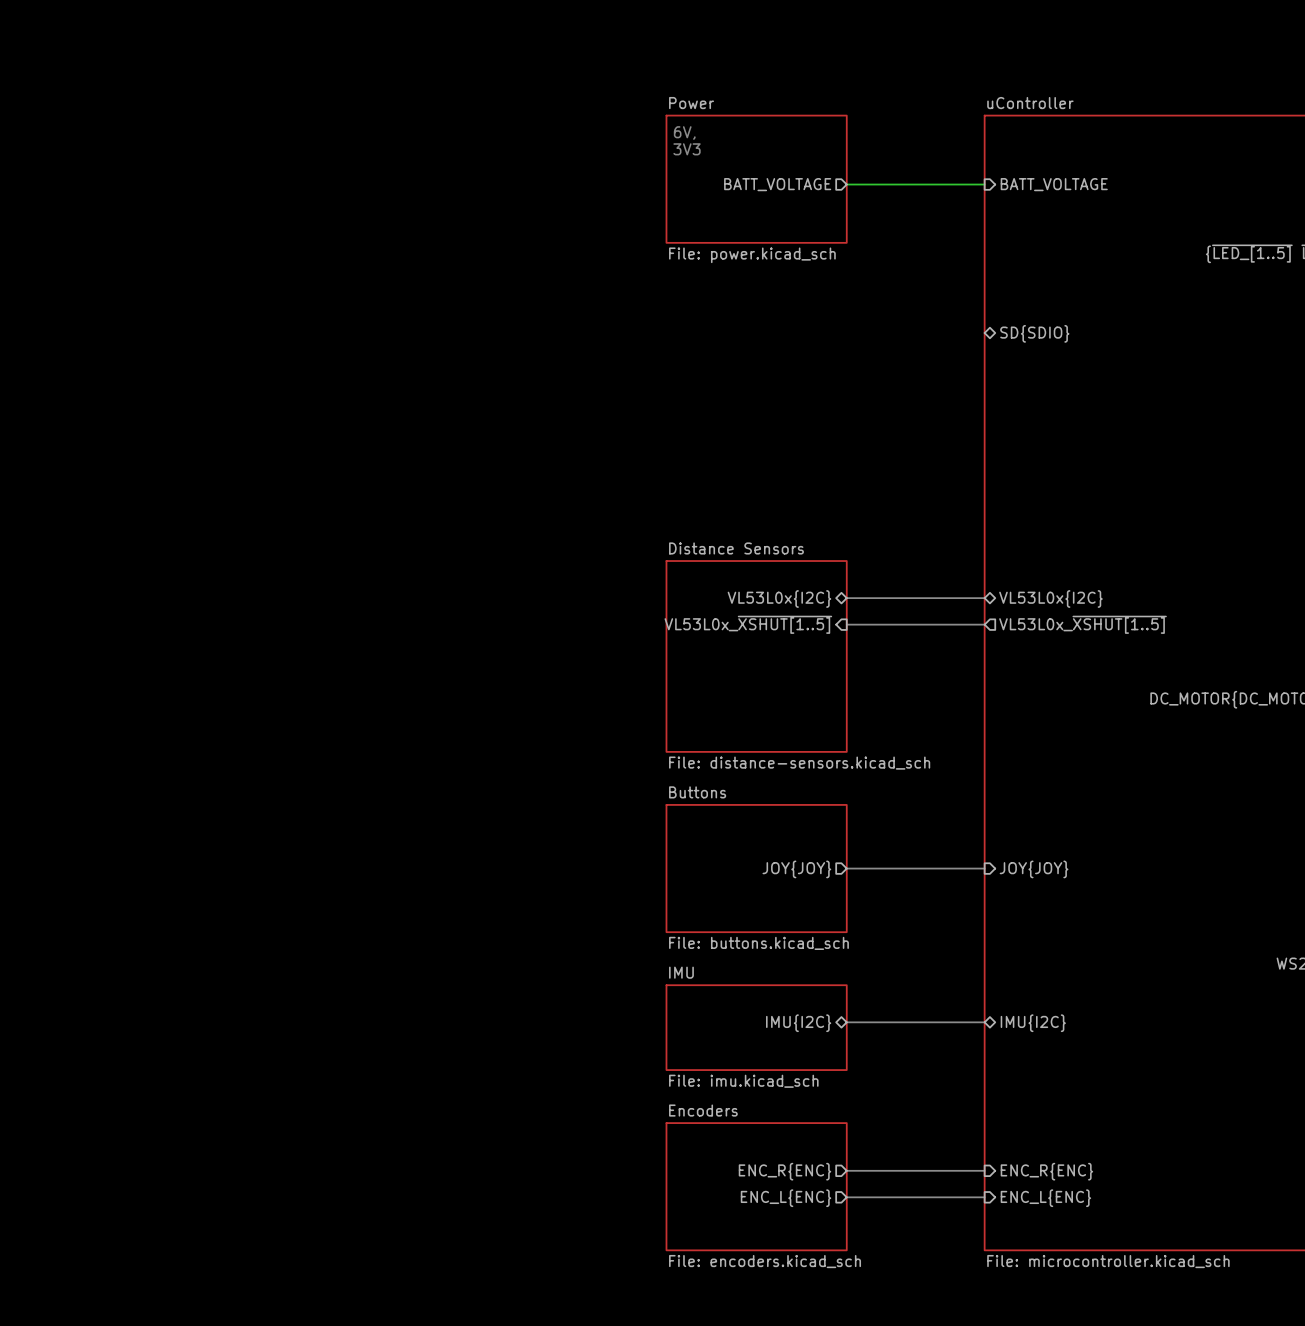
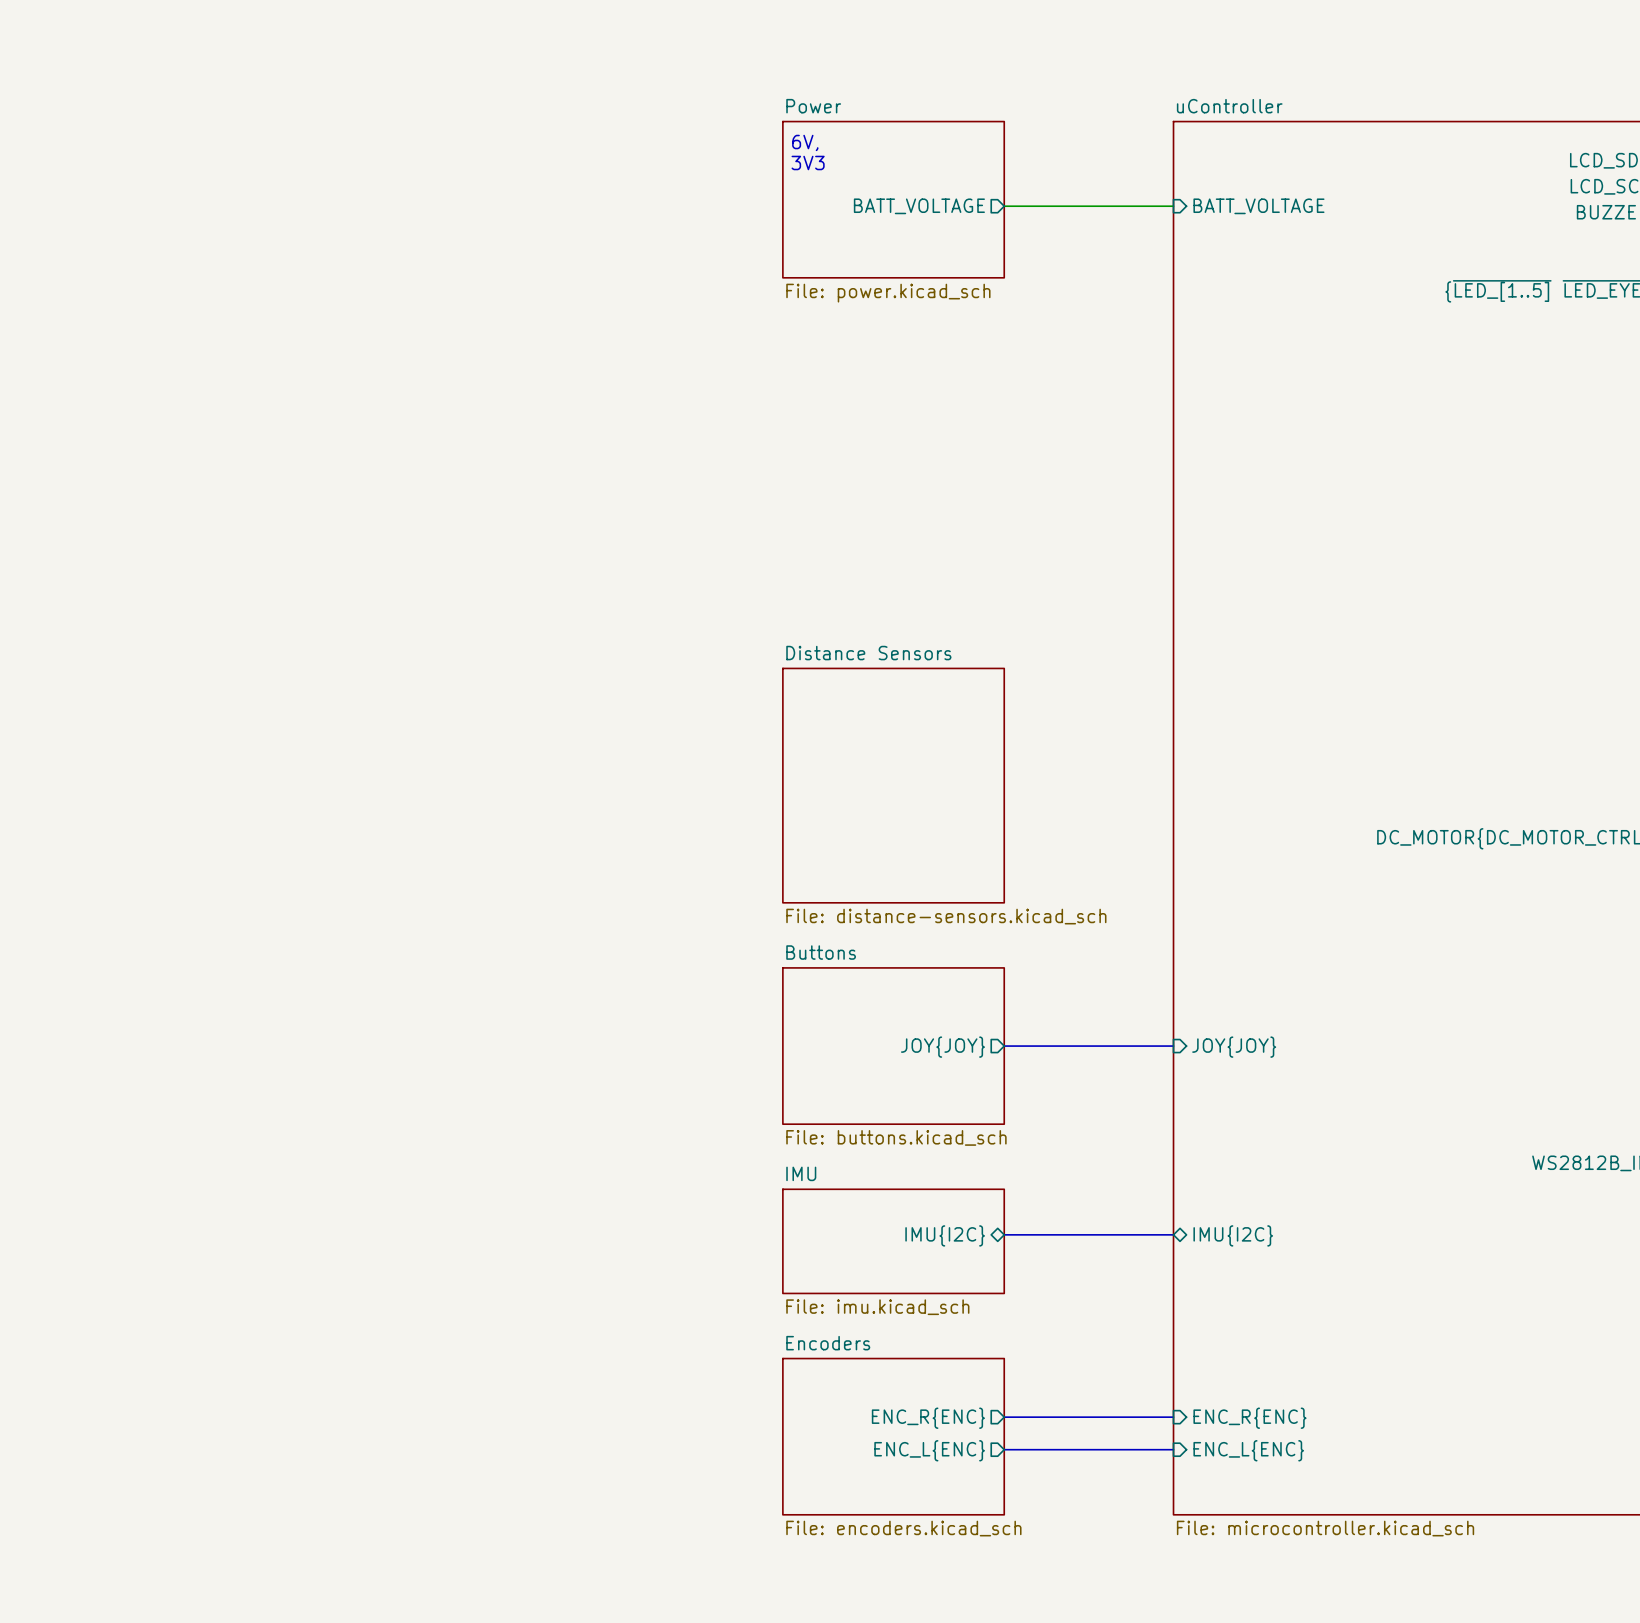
sheet pin: SD{SDIO} (1034, 333) -> none
sheet pin: VL53L0x{I2C} (779, 598) -> none
bus: (846, 598) (984, 598) -> none
sheet pin: VL53L0x{I2C} (1050, 598) -> none
sheet pin: VL53L0x_~{XSHUT[1..5]} (748, 624) -> none
bus: (846, 624) (984, 624) -> none
sheet pin: VL53L0x_~{XSHUT[1..5]} (1083, 624) -> none

